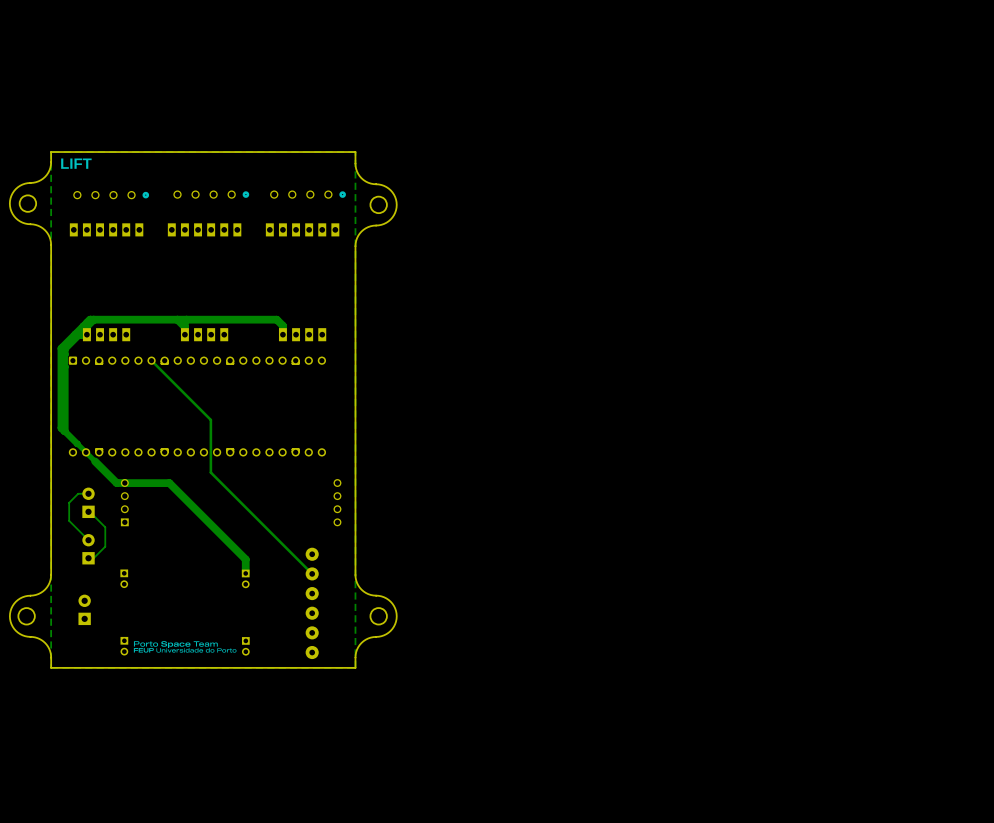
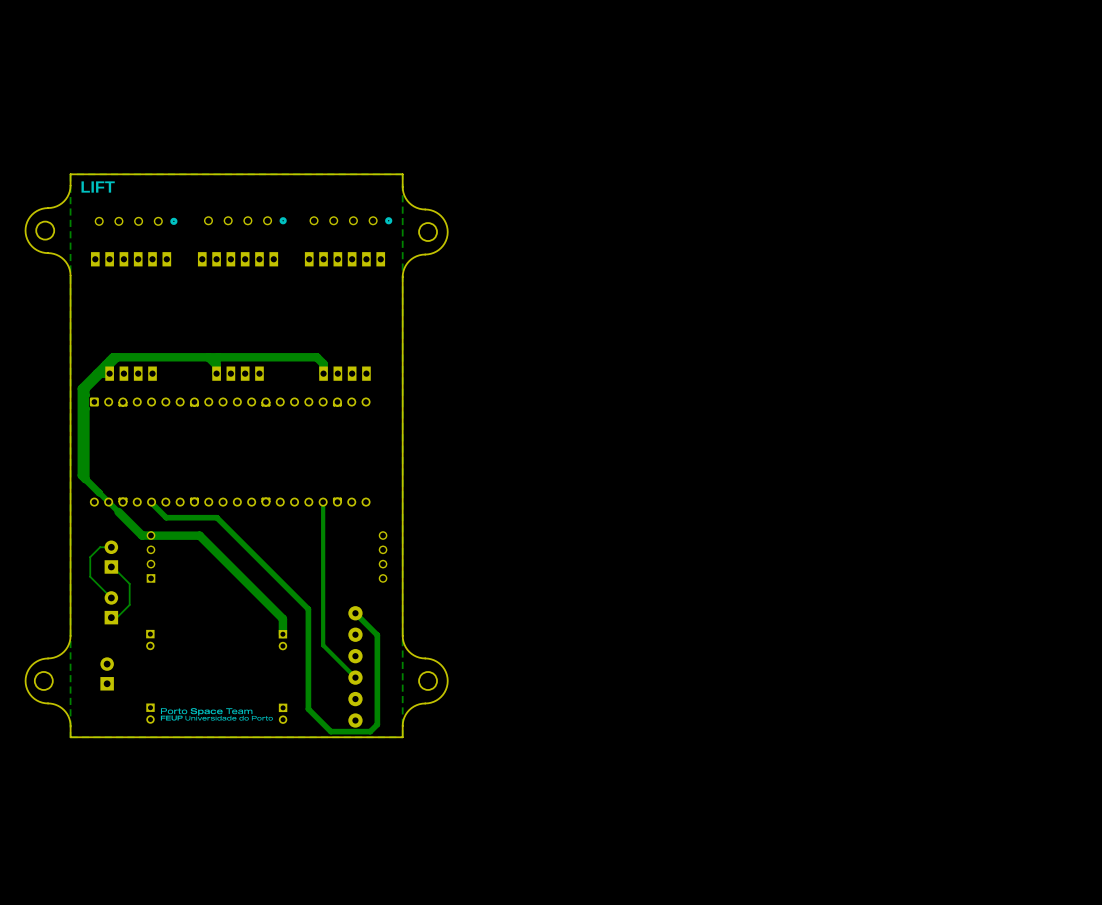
track: (151, 360) (210, 419) (210, 472) (312, 573) -> none
track: none -> (151, 502) (166, 517) (216, 517) (308, 609) (308, 709) (330, 731) (370, 731) (377, 724) (377, 635) (355, 613)
track: none -> (323, 502) (323, 645) (355, 677)

